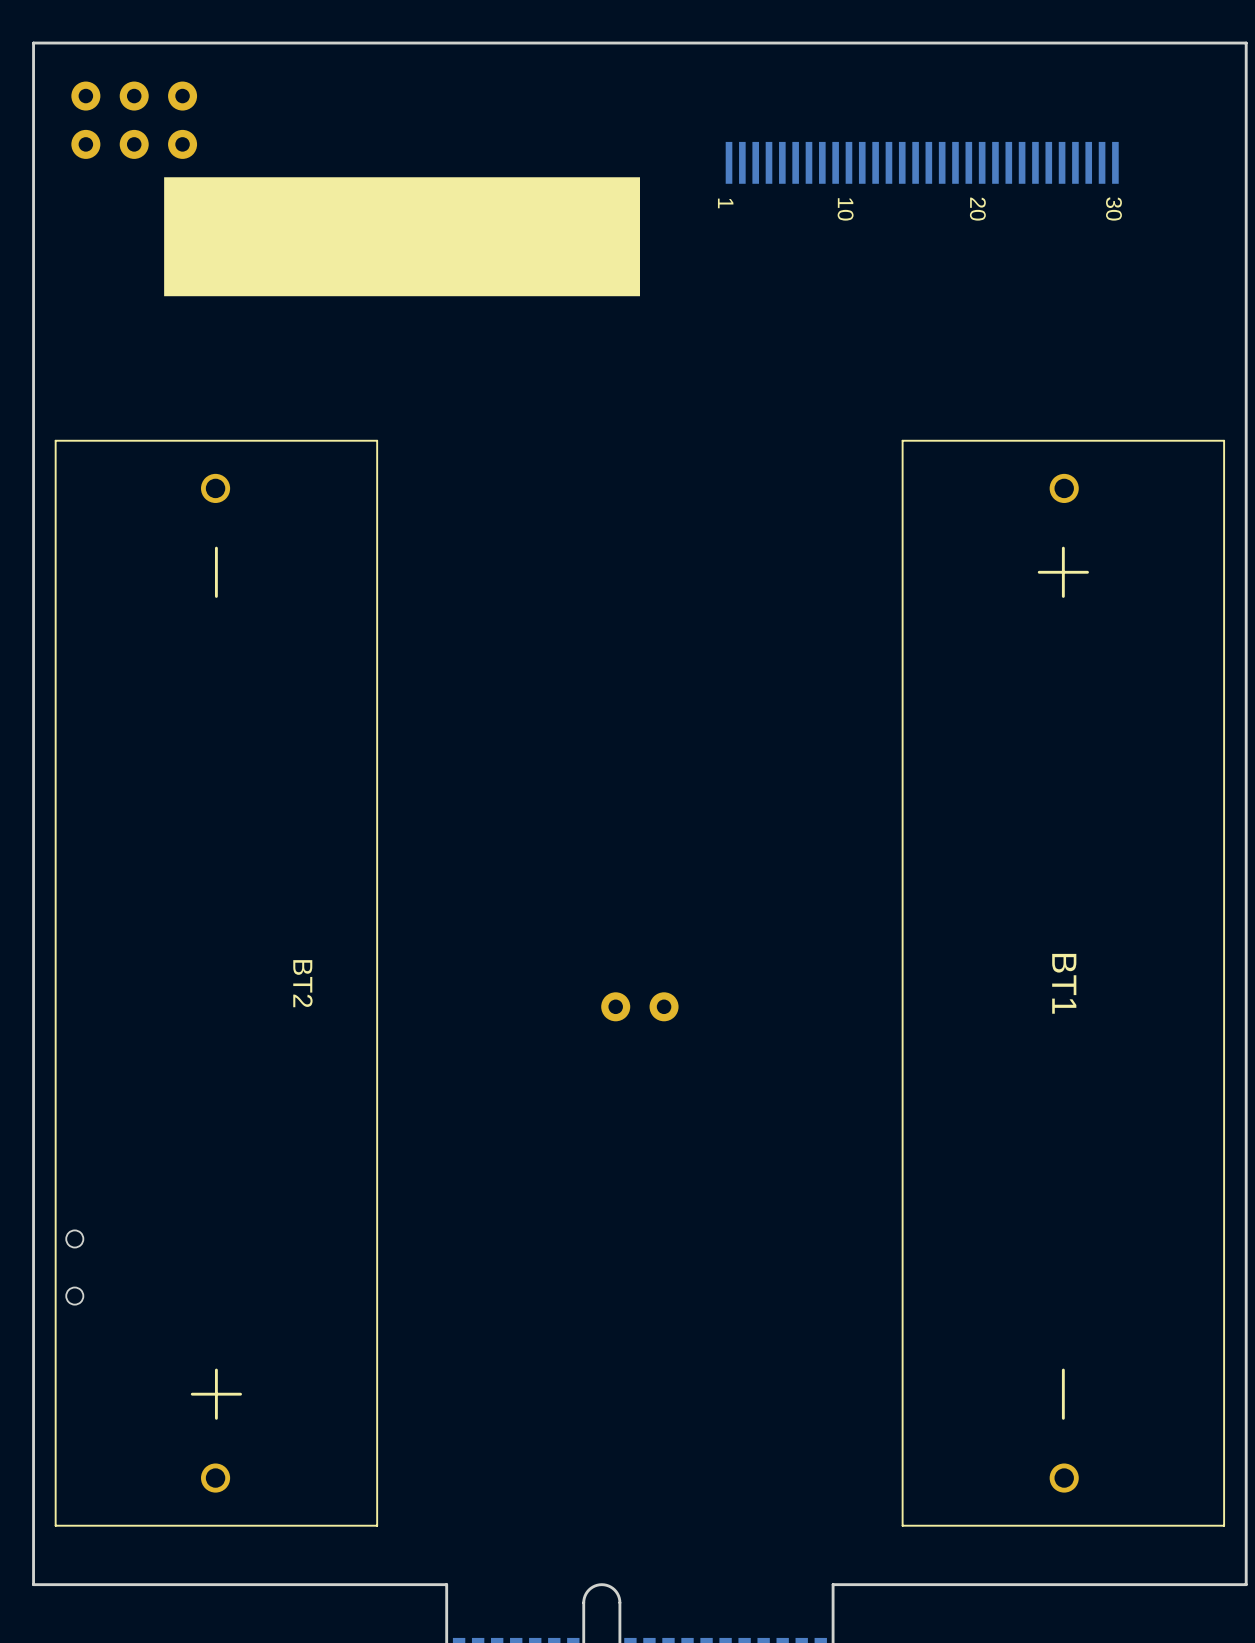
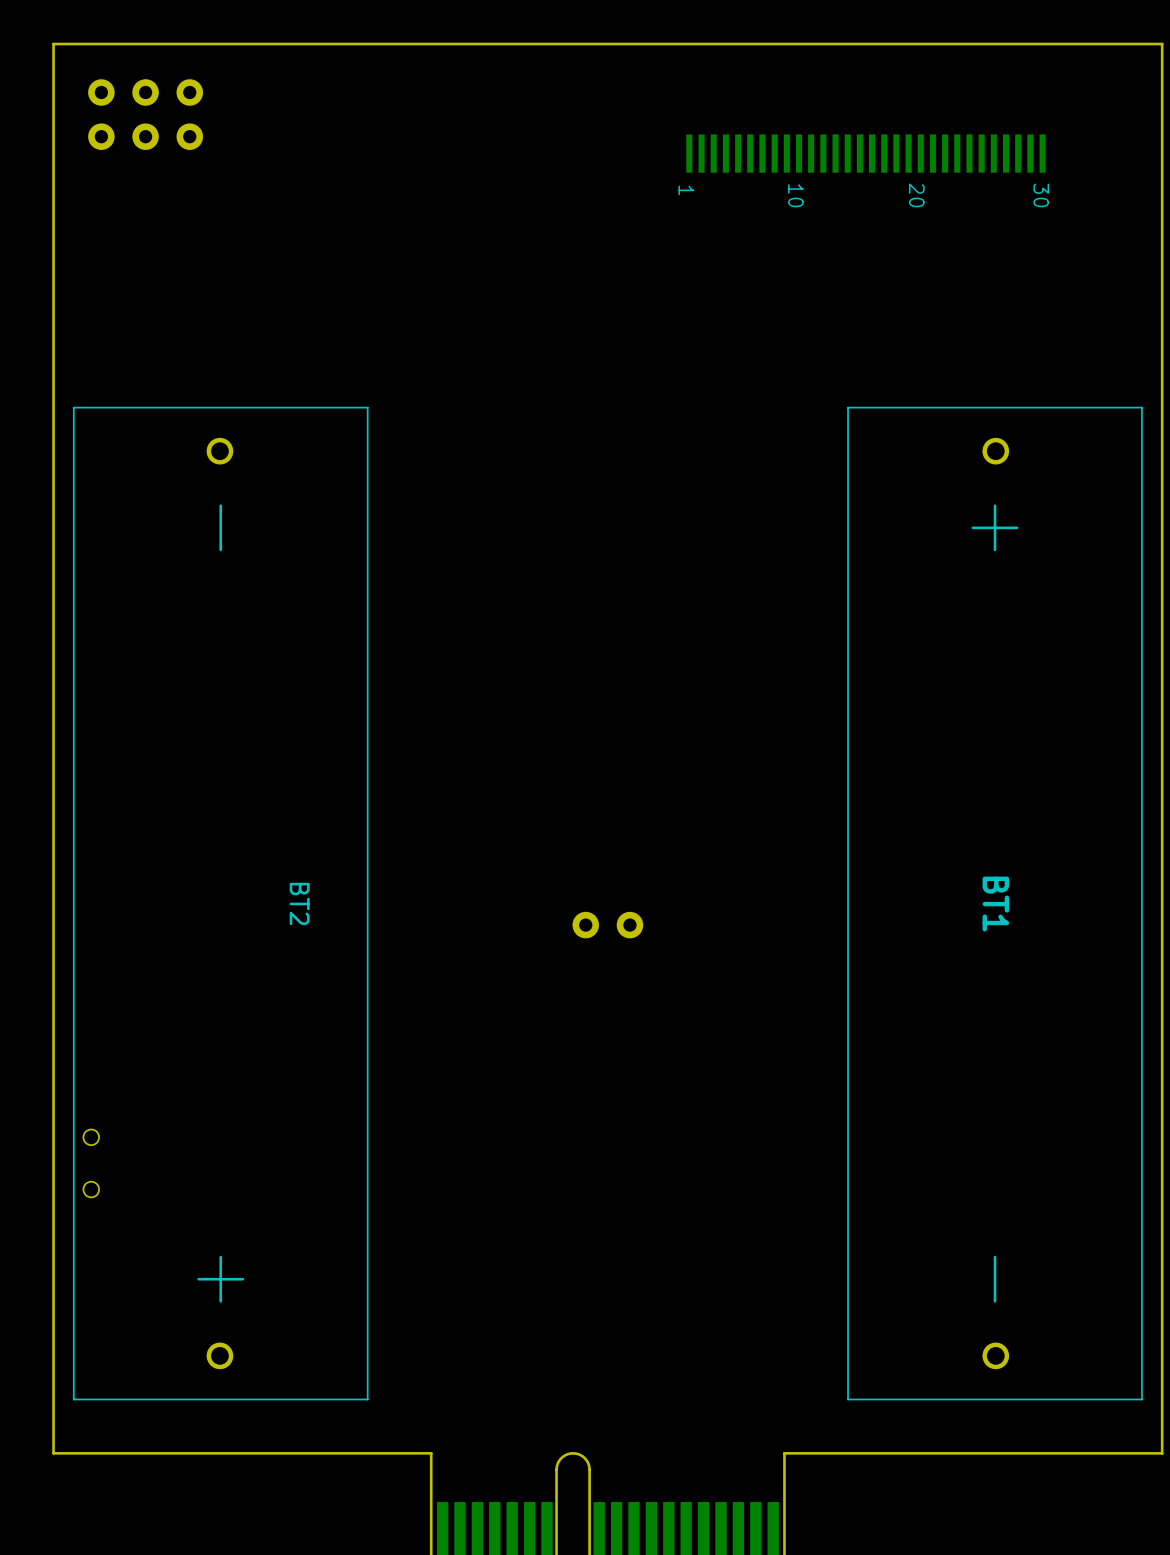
drawing: [164, 177, 640, 297] -> none

